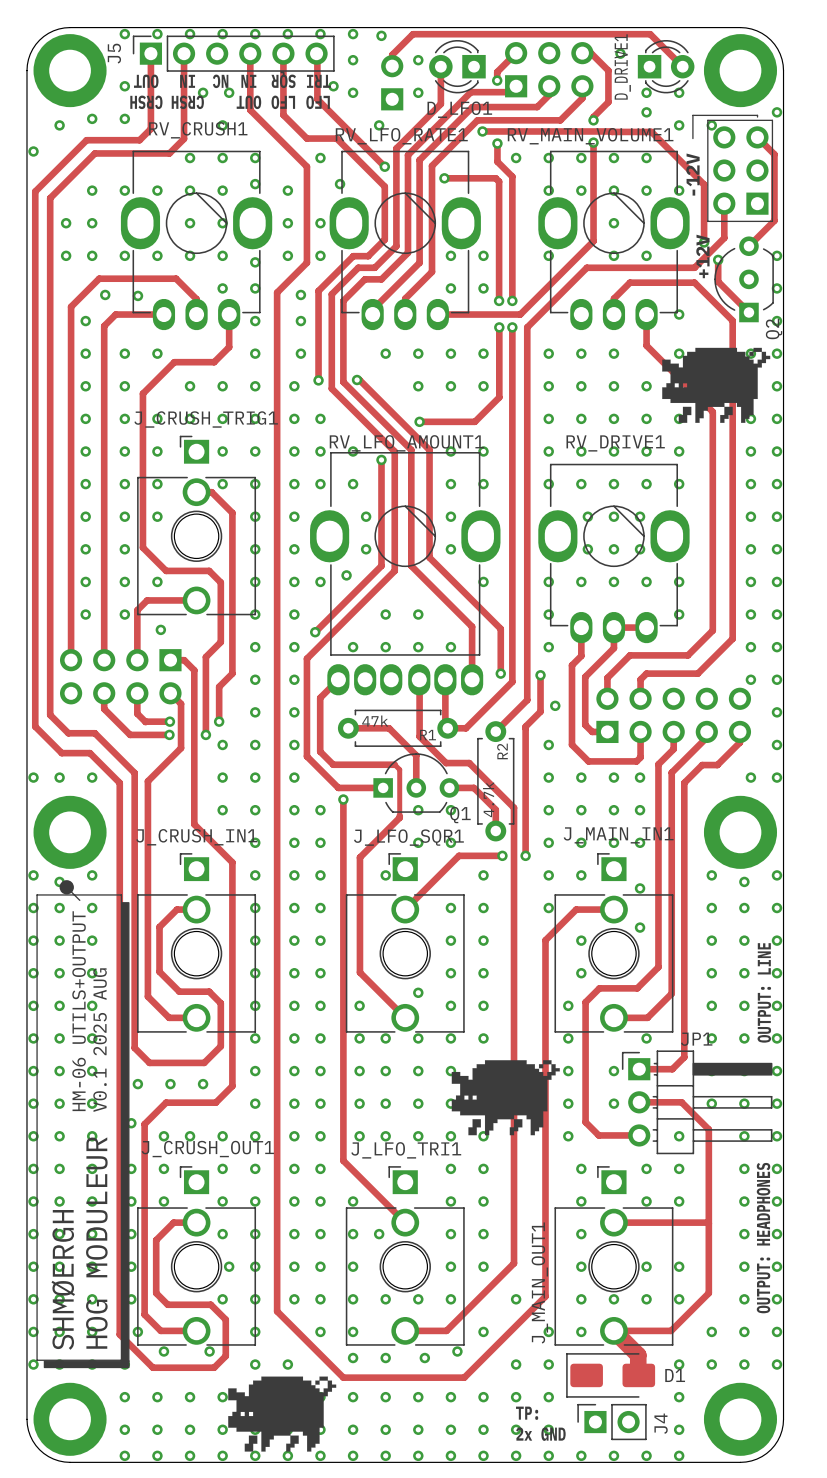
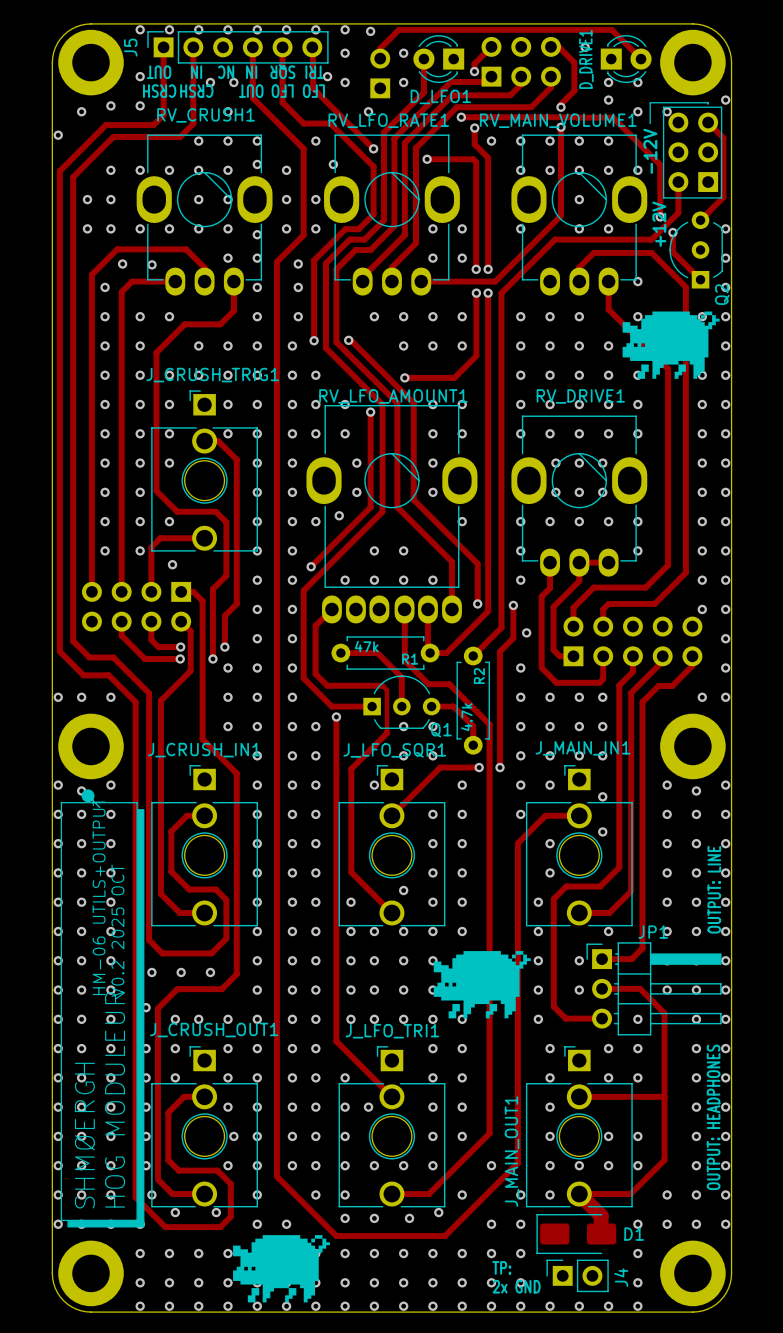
text: V0.1 2025 AUG (100, 1040) -> V0.2 2025 OCT (117, 930)

